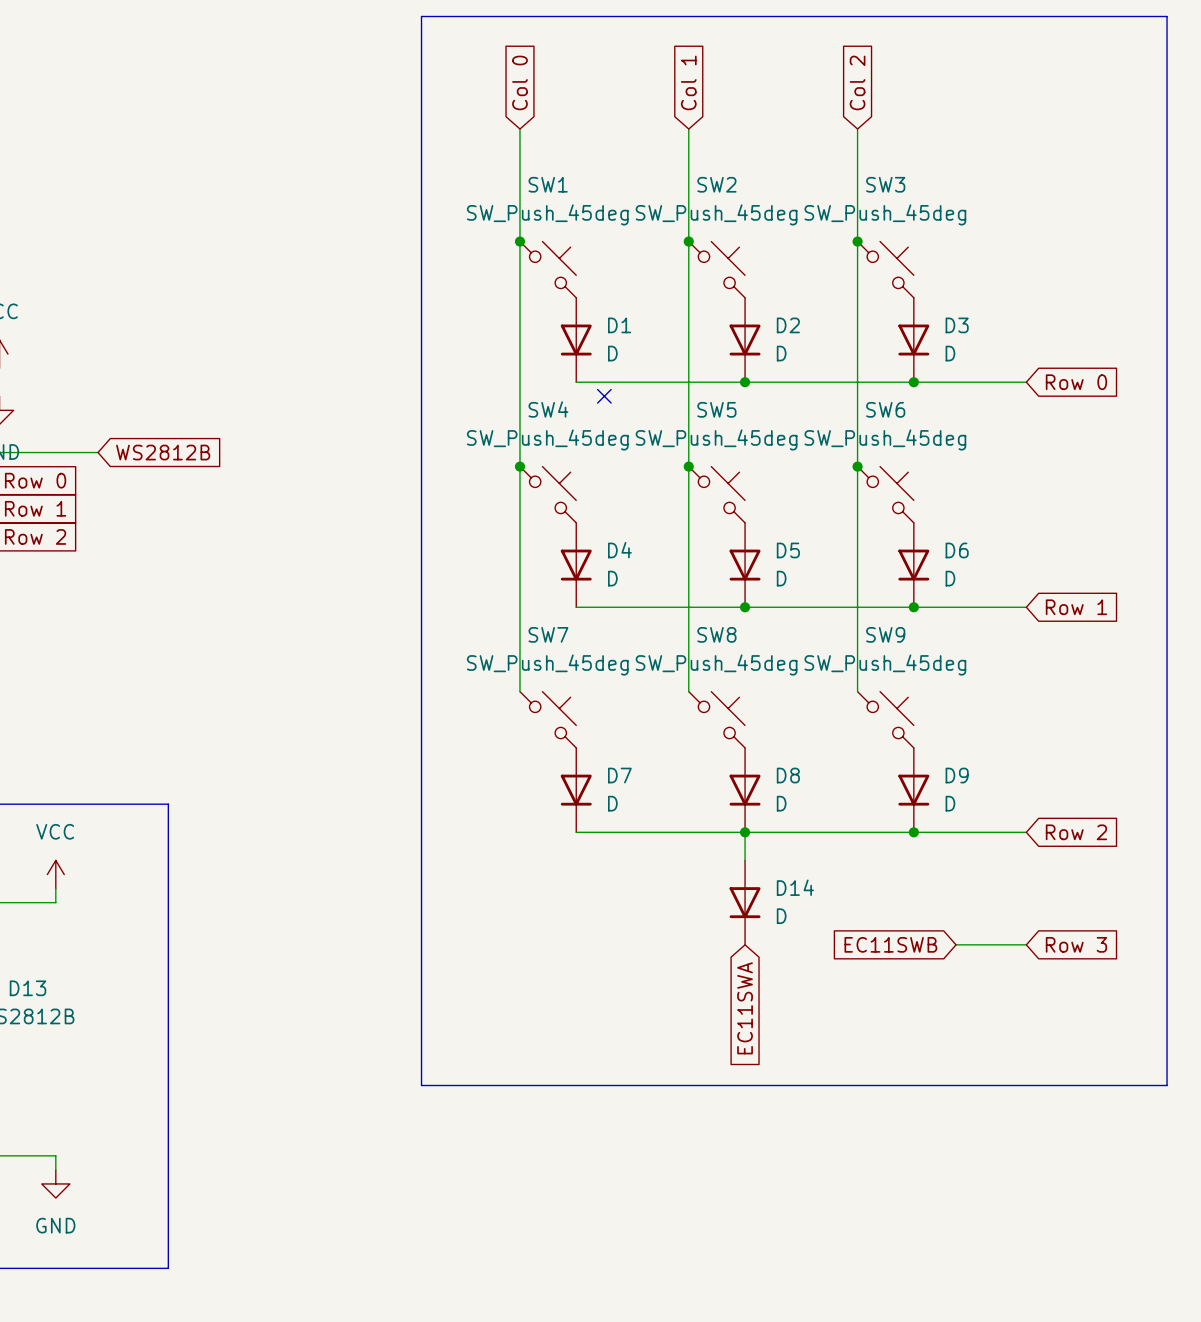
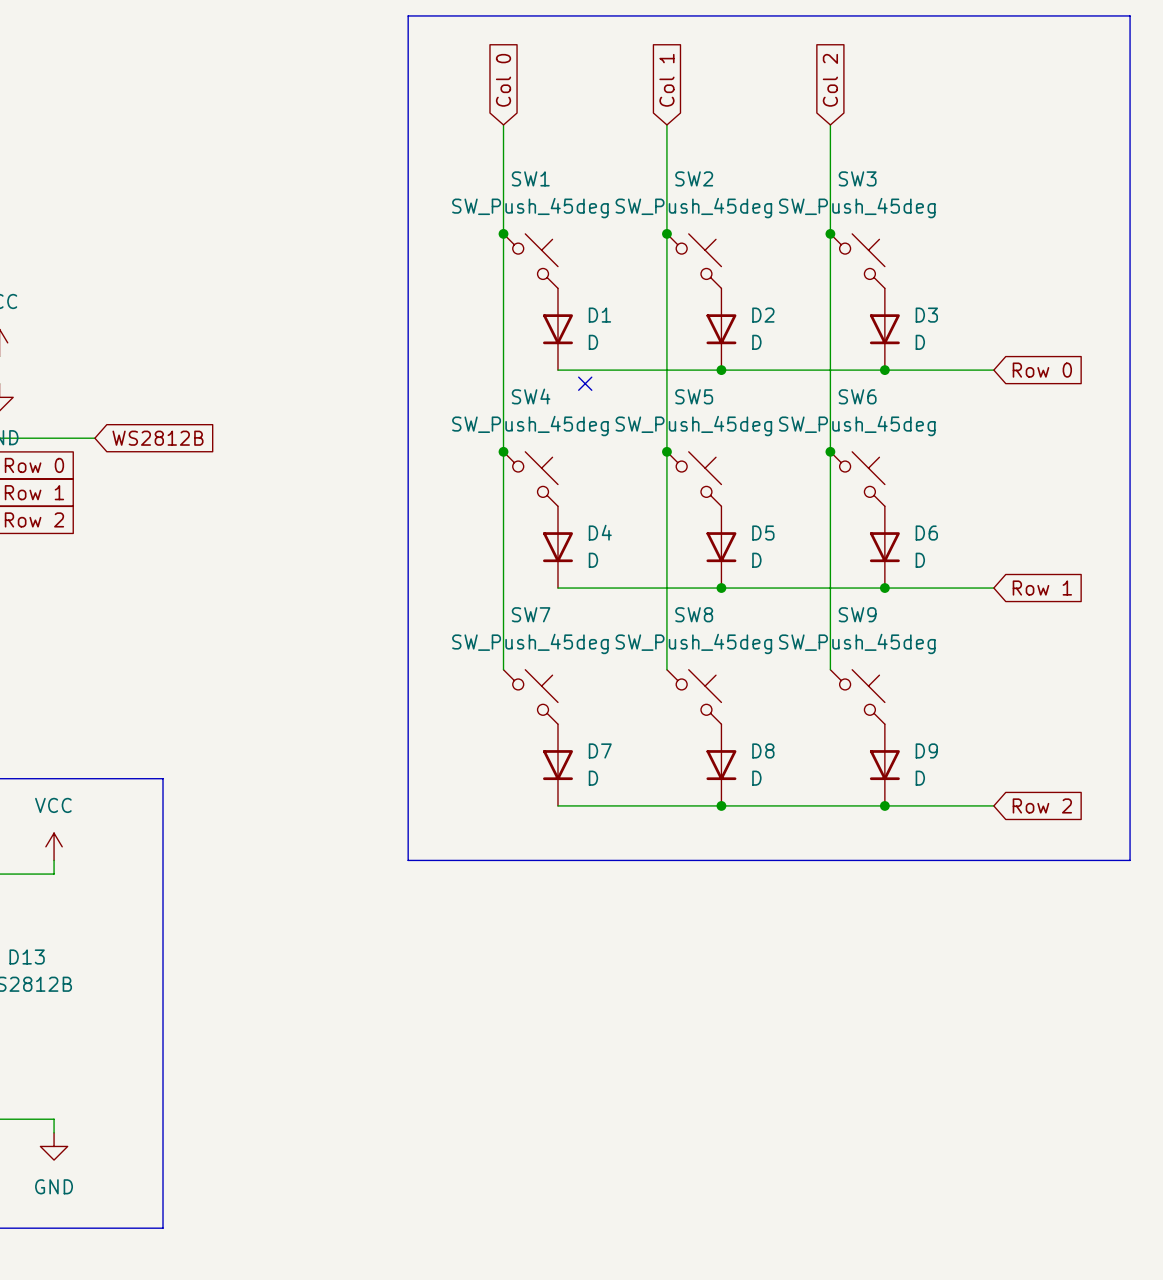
wire: (745, 832) (745, 860) -> none
line: (421, 888) (421, 1085) (1167, 1085) (1167, 888) -> (408, 860) (1130, 860)
D14: D (745, 902) -> none
global label: EC11SWB (890, 944) -> none
wire: (956, 944) (1026, 944) -> none
global label: Row 3 (1076, 944) -> none
global label: EC11SWA (745, 1008) -> none

